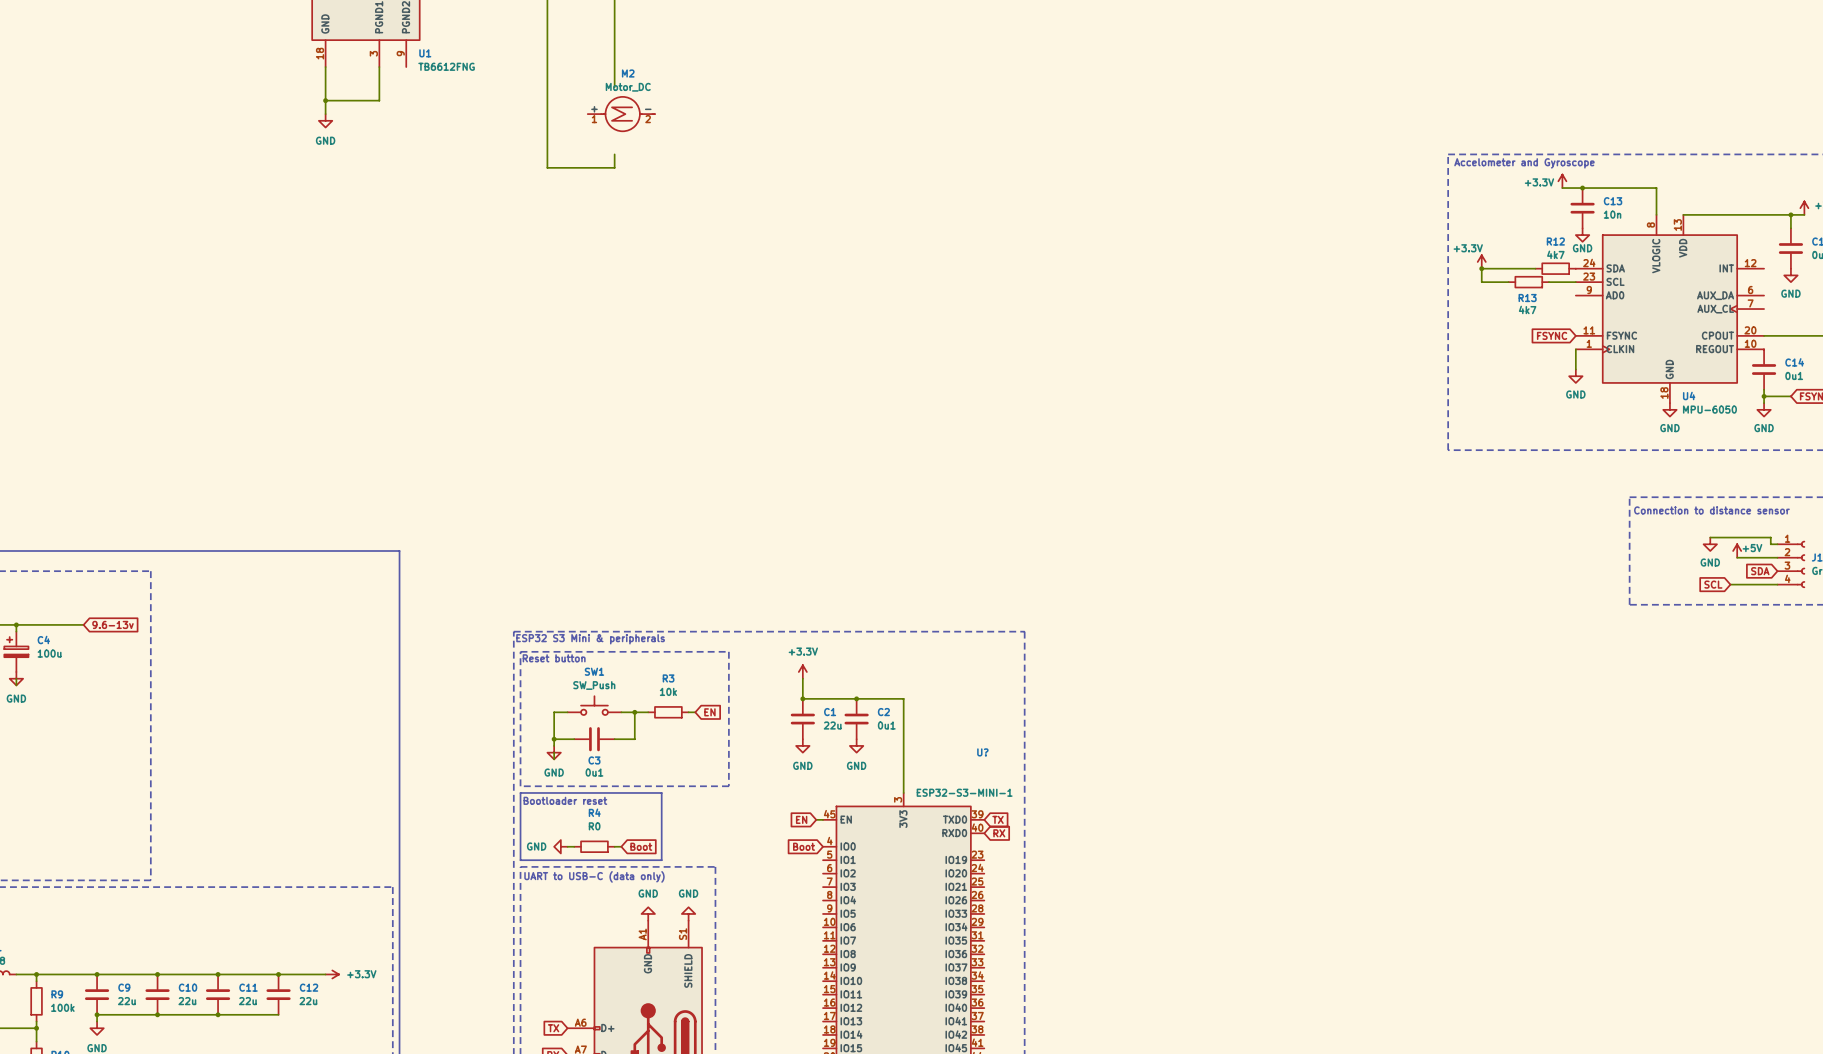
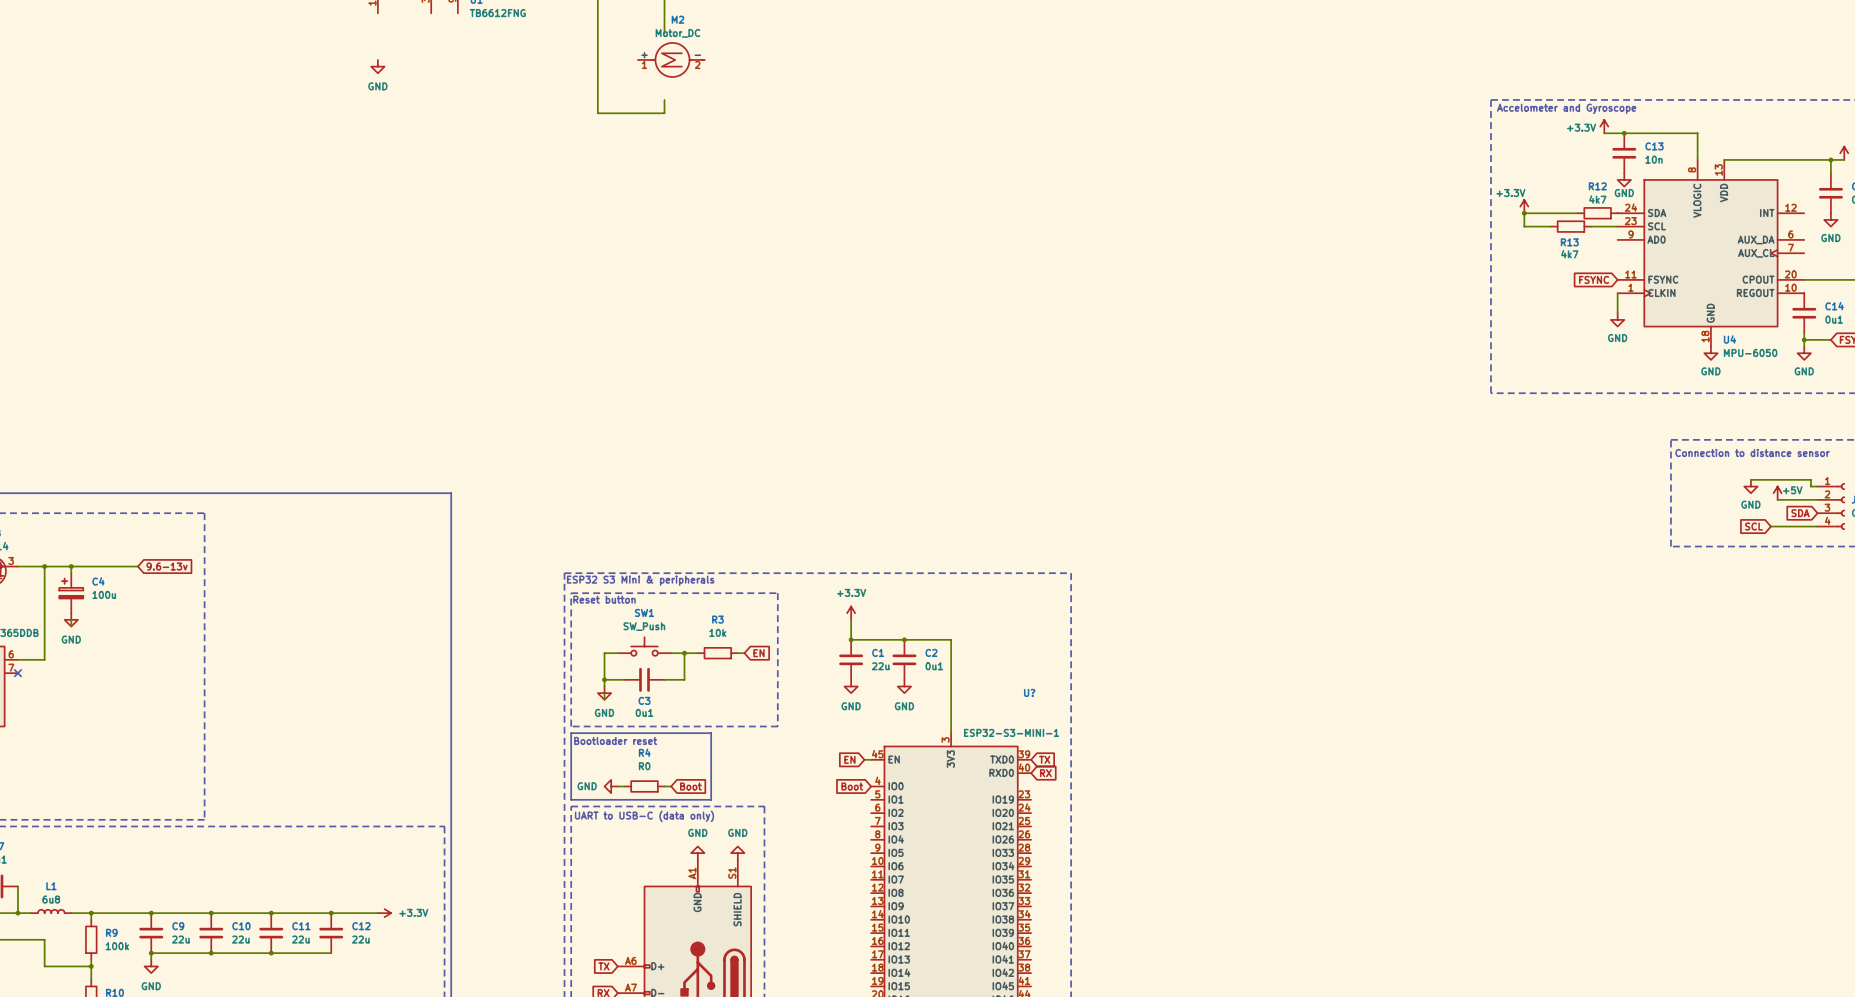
wire: (325, 67) (325, 114) -> none
wire: (379, 67) (379, 100) (325, 100) -> none
junction: (325, 100) -> none

